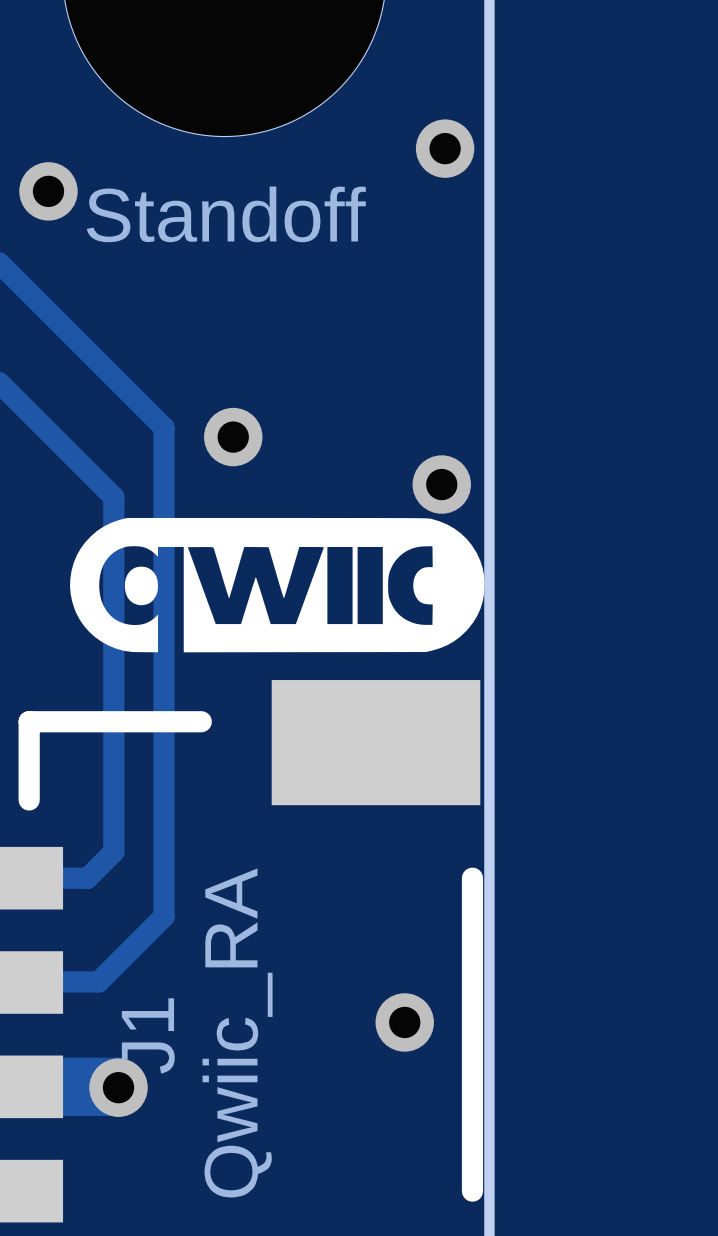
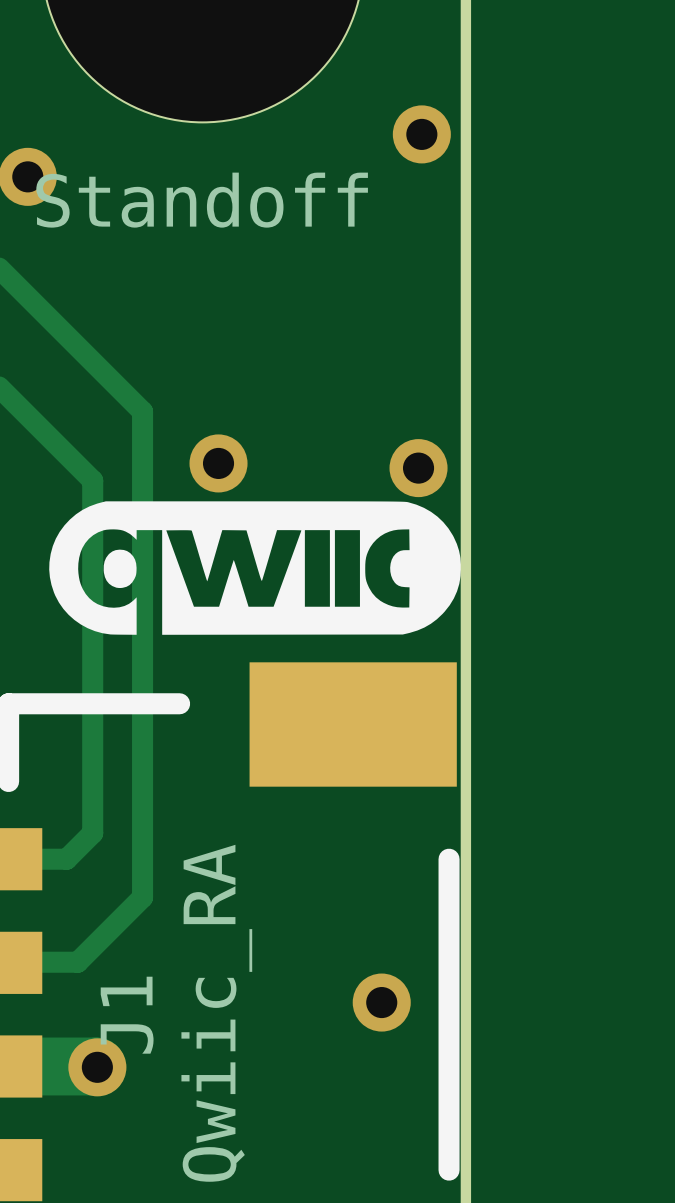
via position: (233, 437) -> (218, 463)

